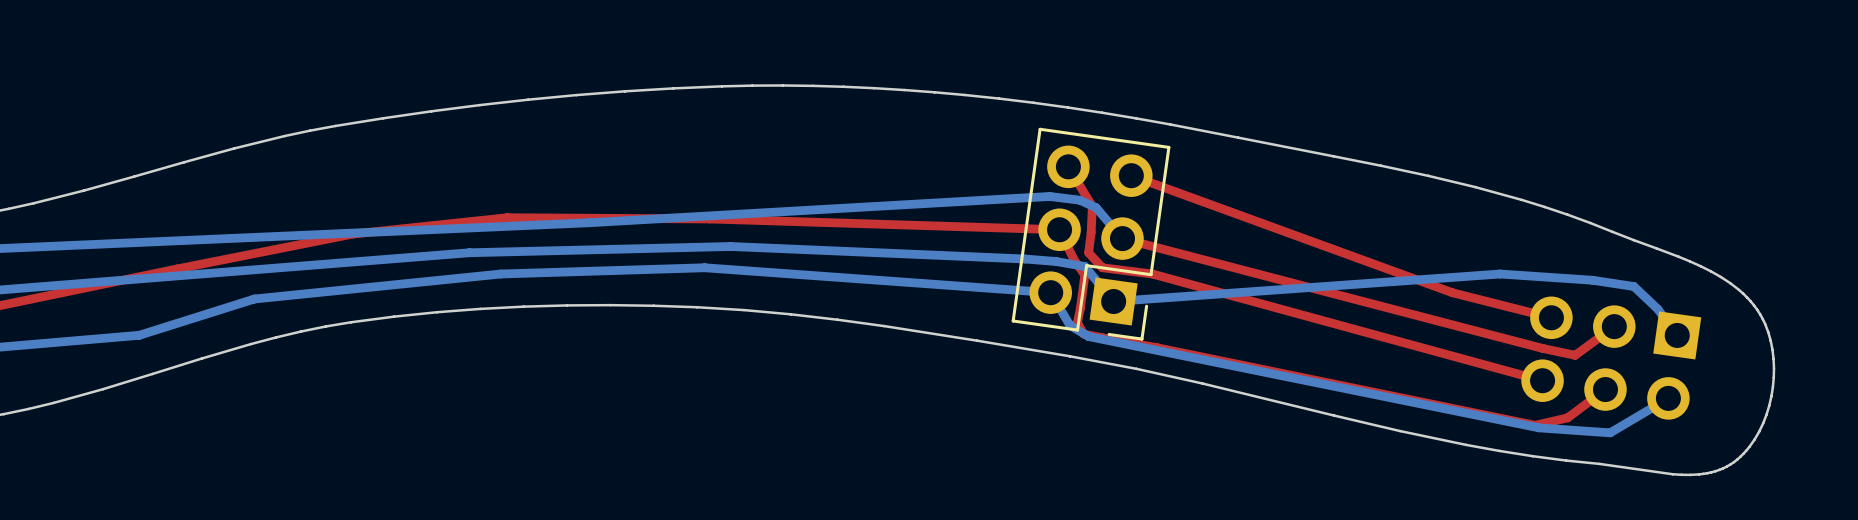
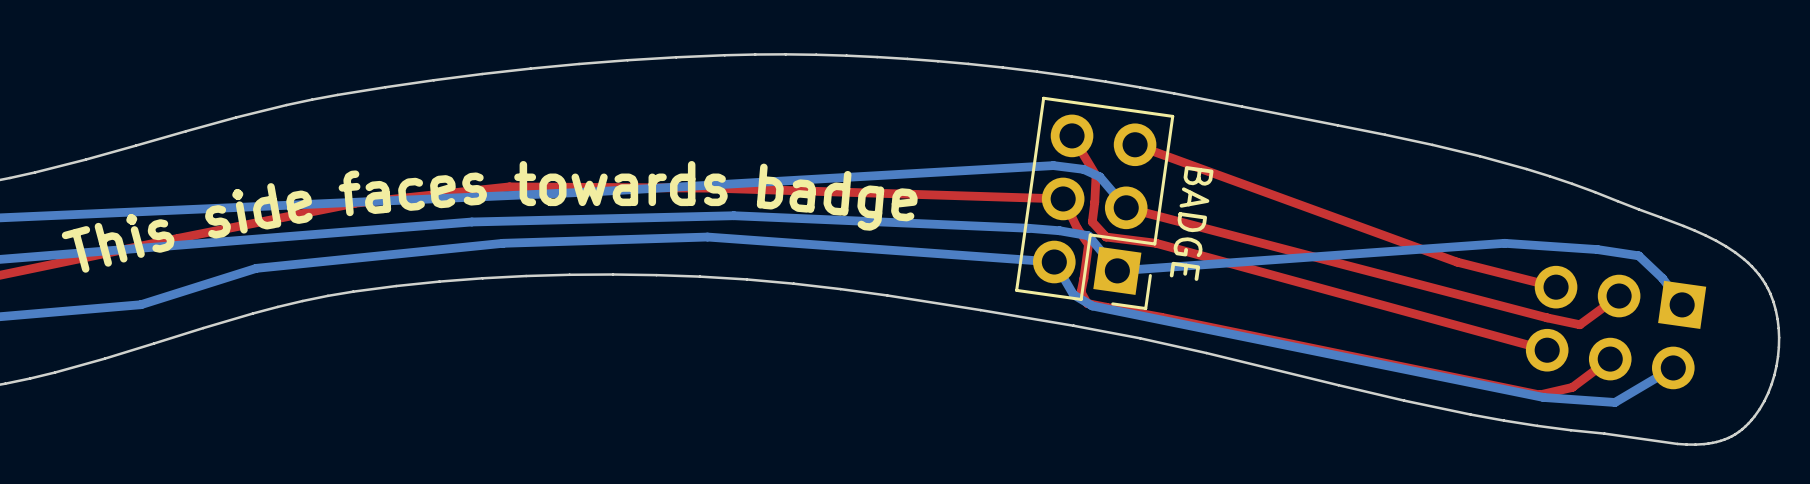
text: none -> towards (620, 183)
text: none -> faces (412, 193)
text: none -> badge (837, 197)
text: none -> side (258, 210)
text: none -> BADGE (1191, 223)
text: none -> This (118, 243)

